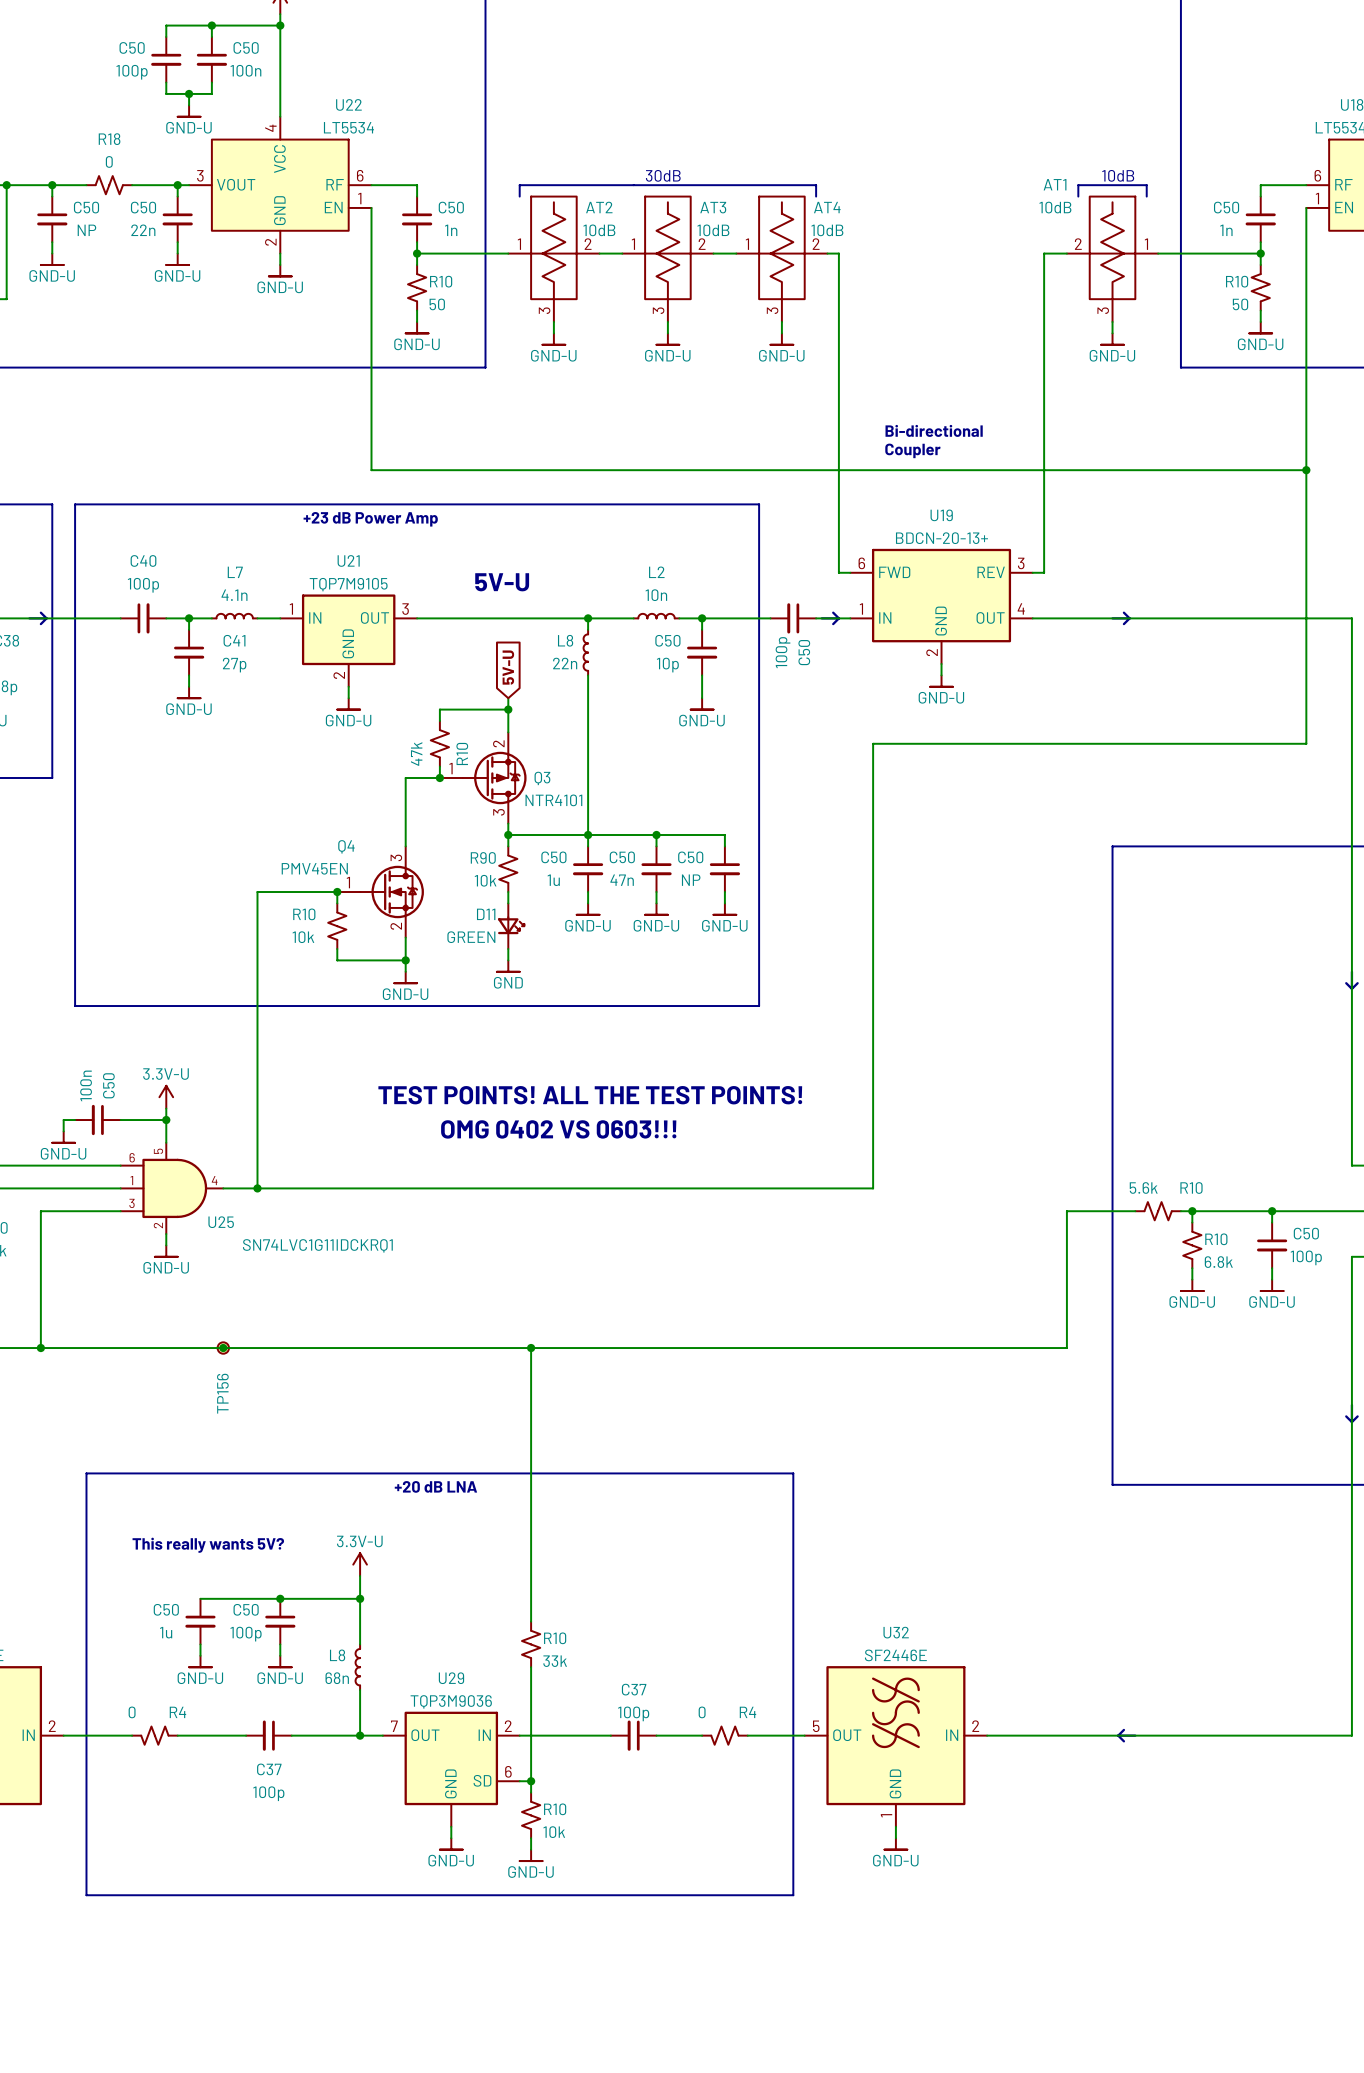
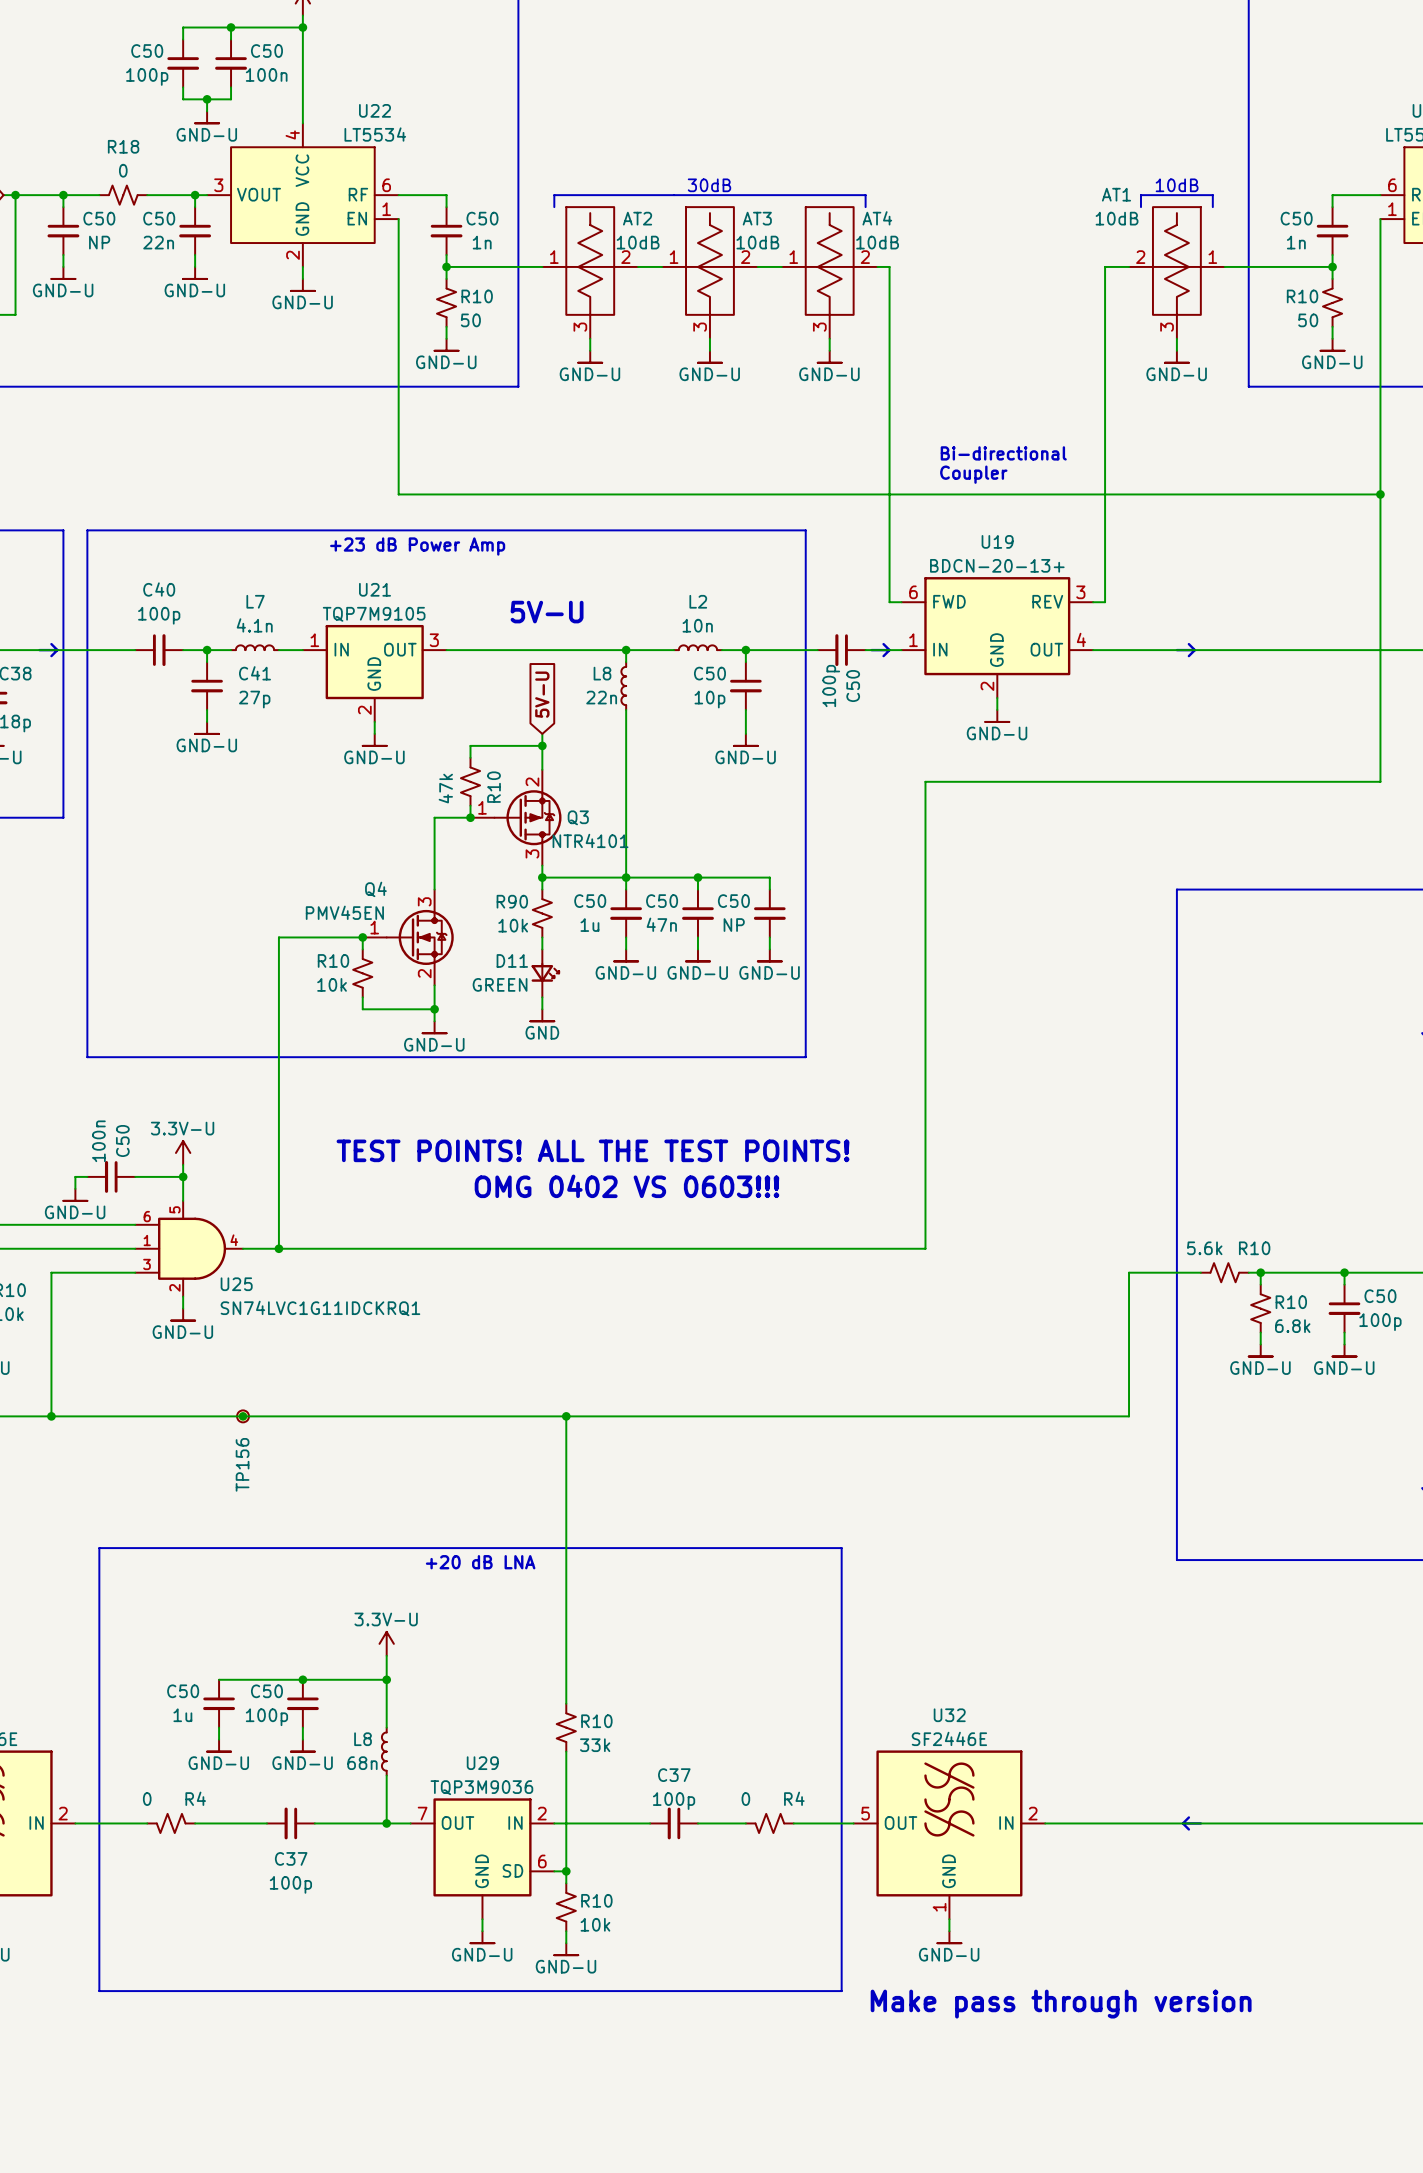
text: This really wants 5V? (208, 1545) -> none
text: none -> Make pass through version (1061, 2004)

